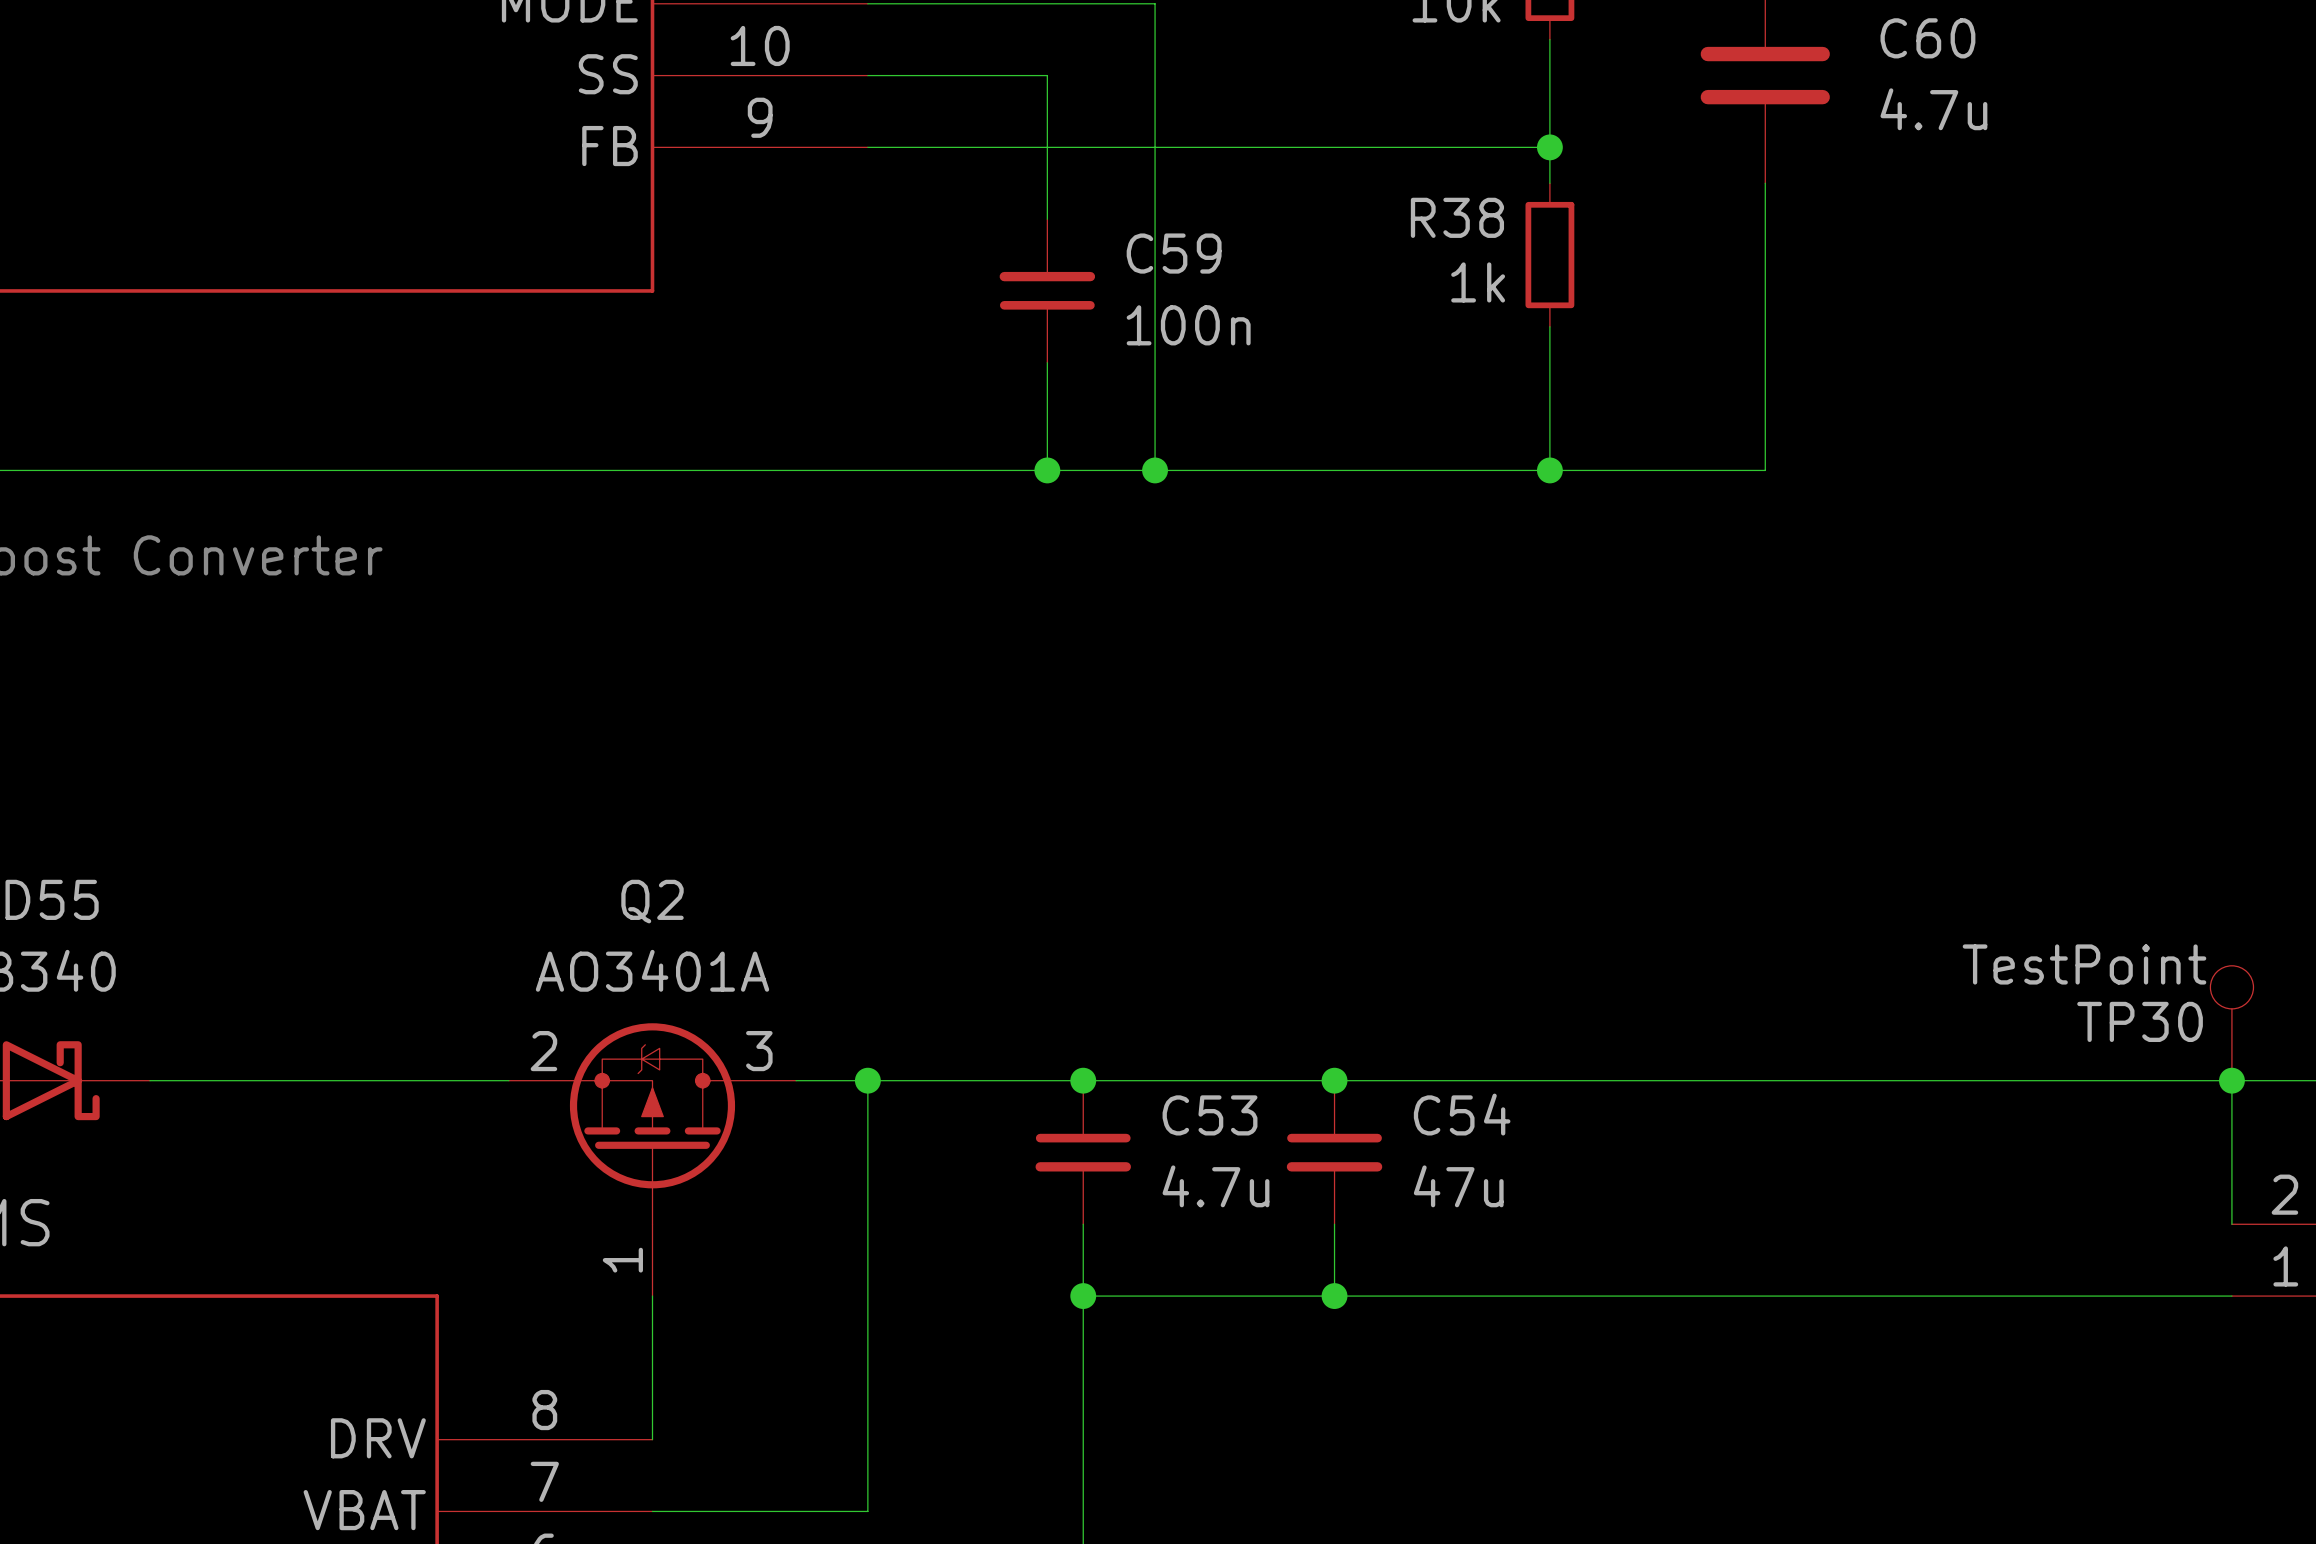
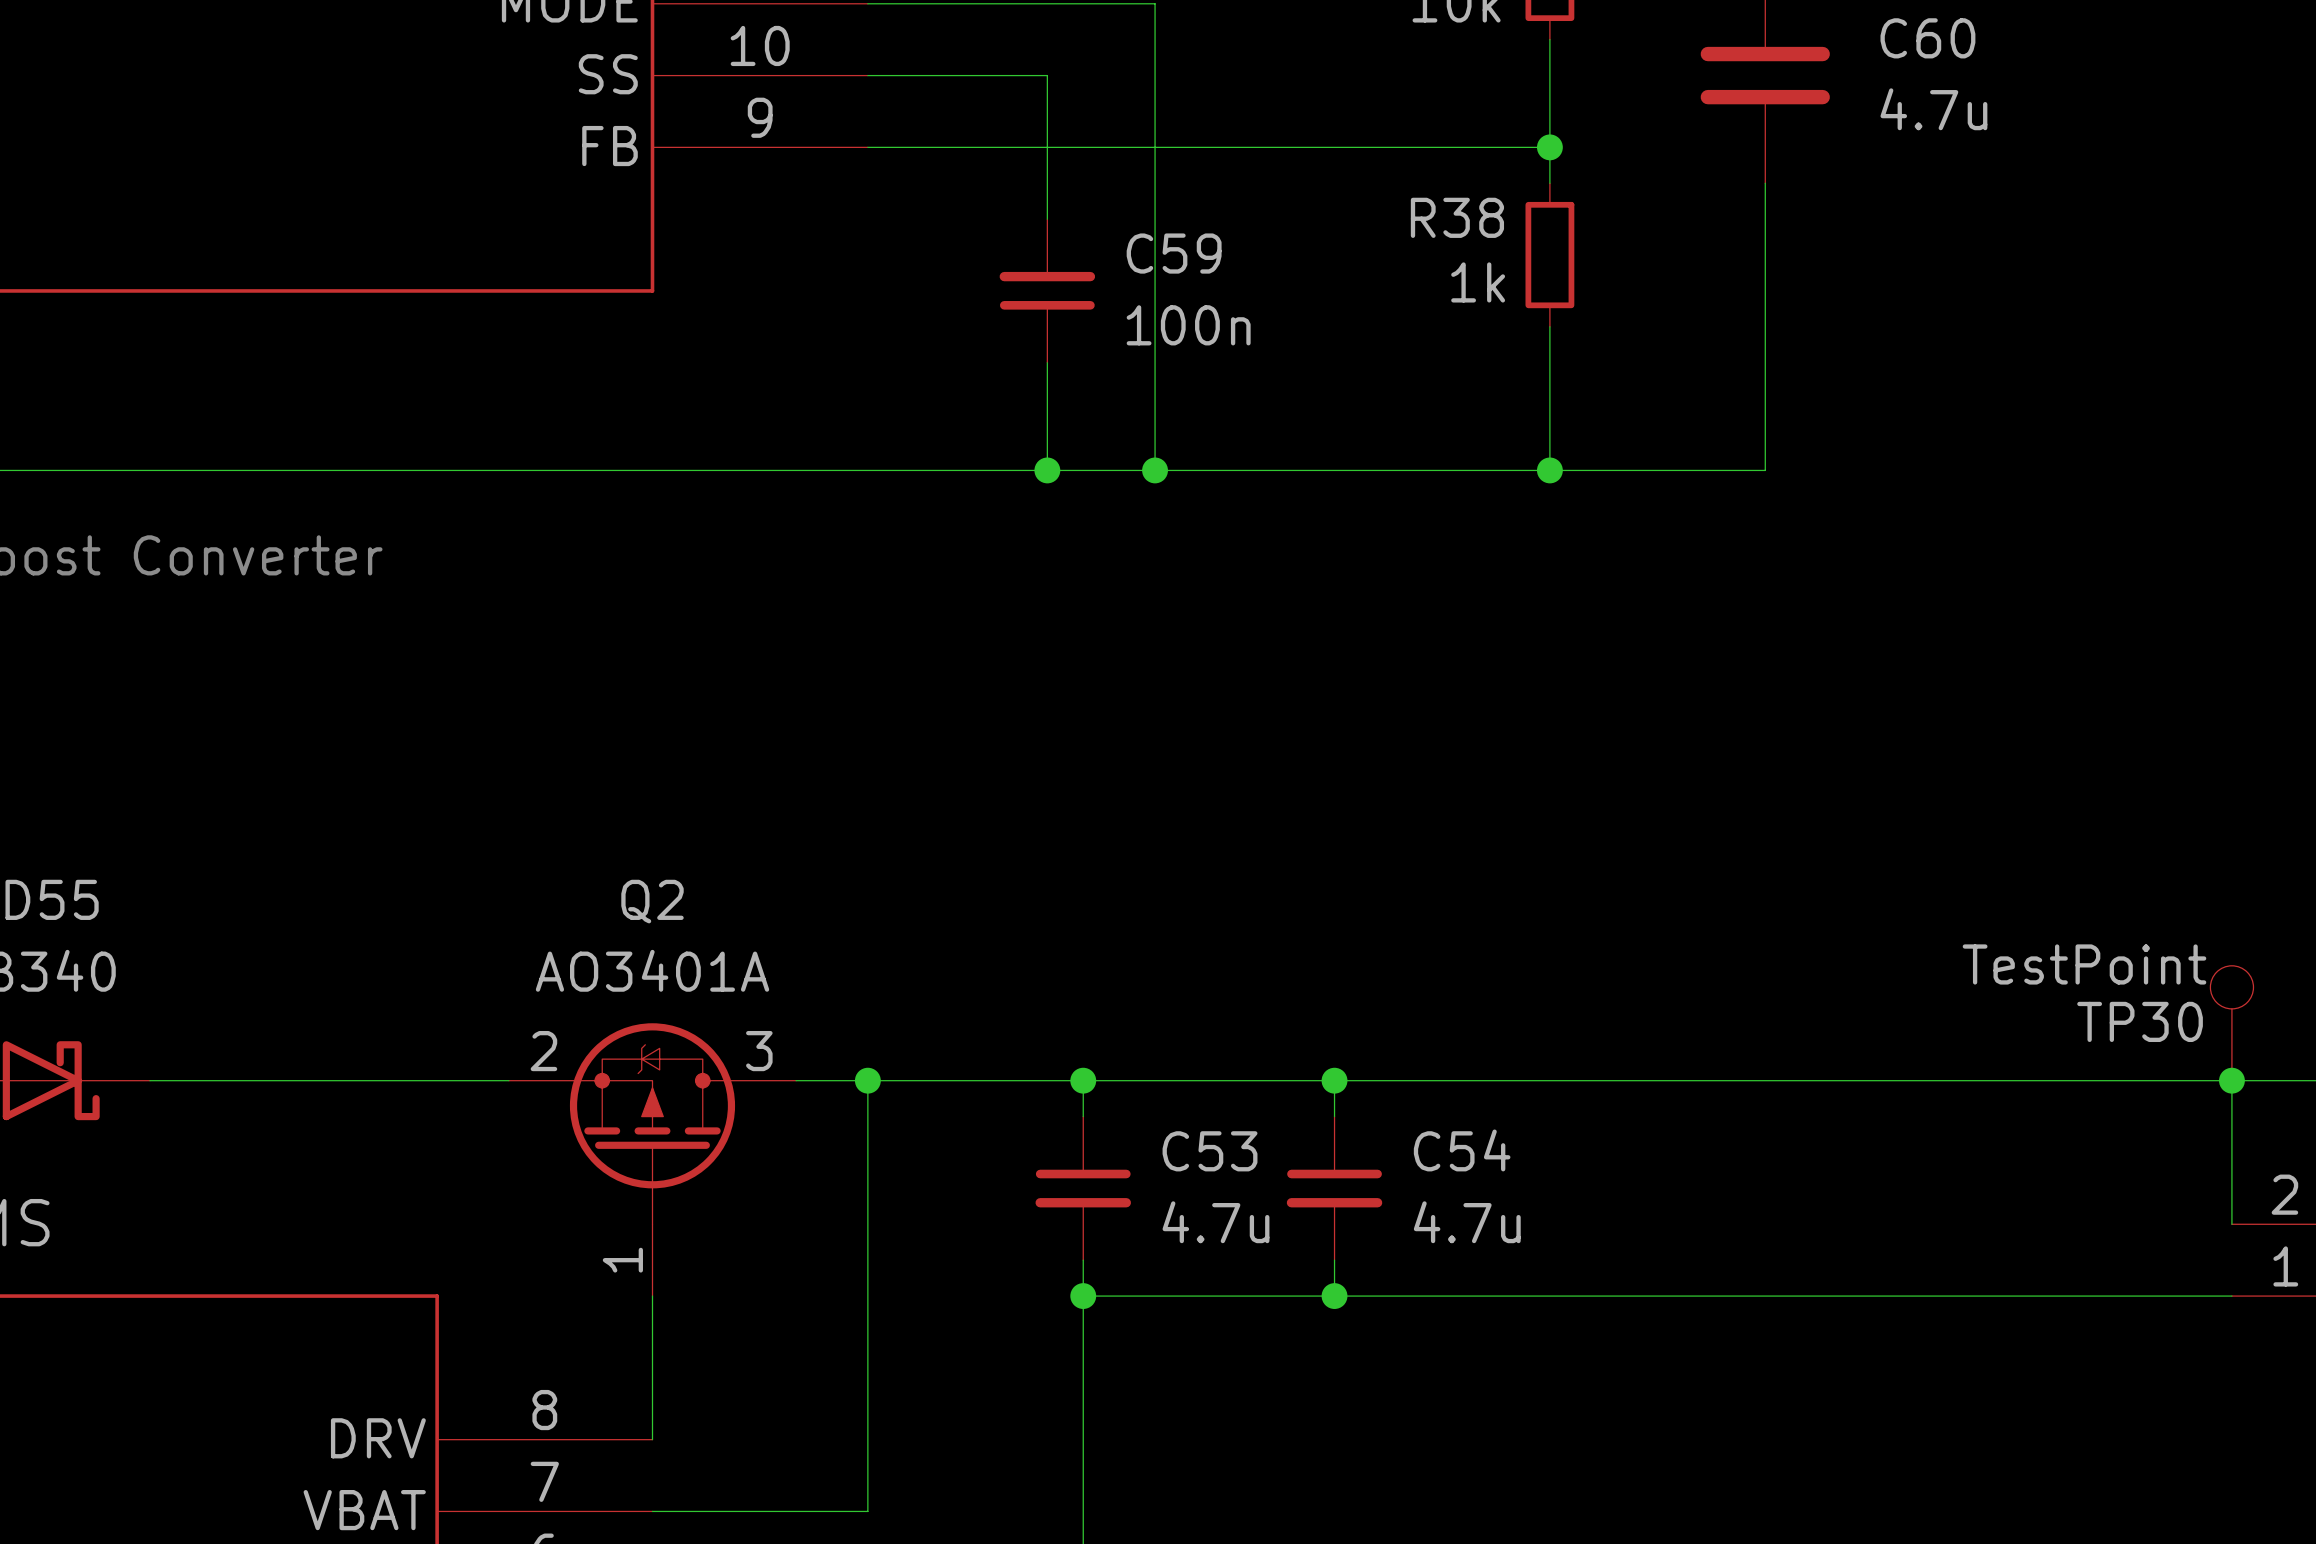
C53 position: (1083, 1152) -> (1083, 1188)
C54 position: (1334, 1152) -> (1334, 1188)
C54 value: 47u (1458, 1186) -> 4.7u (1467, 1222)

